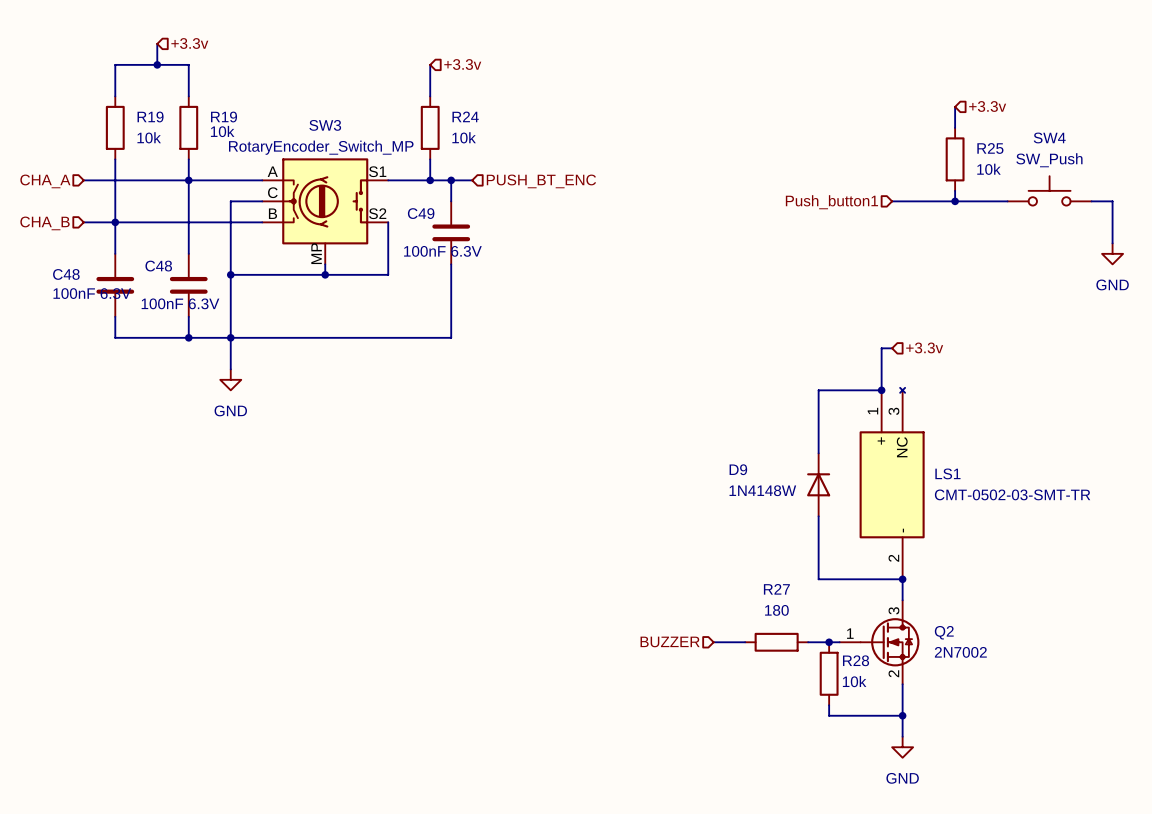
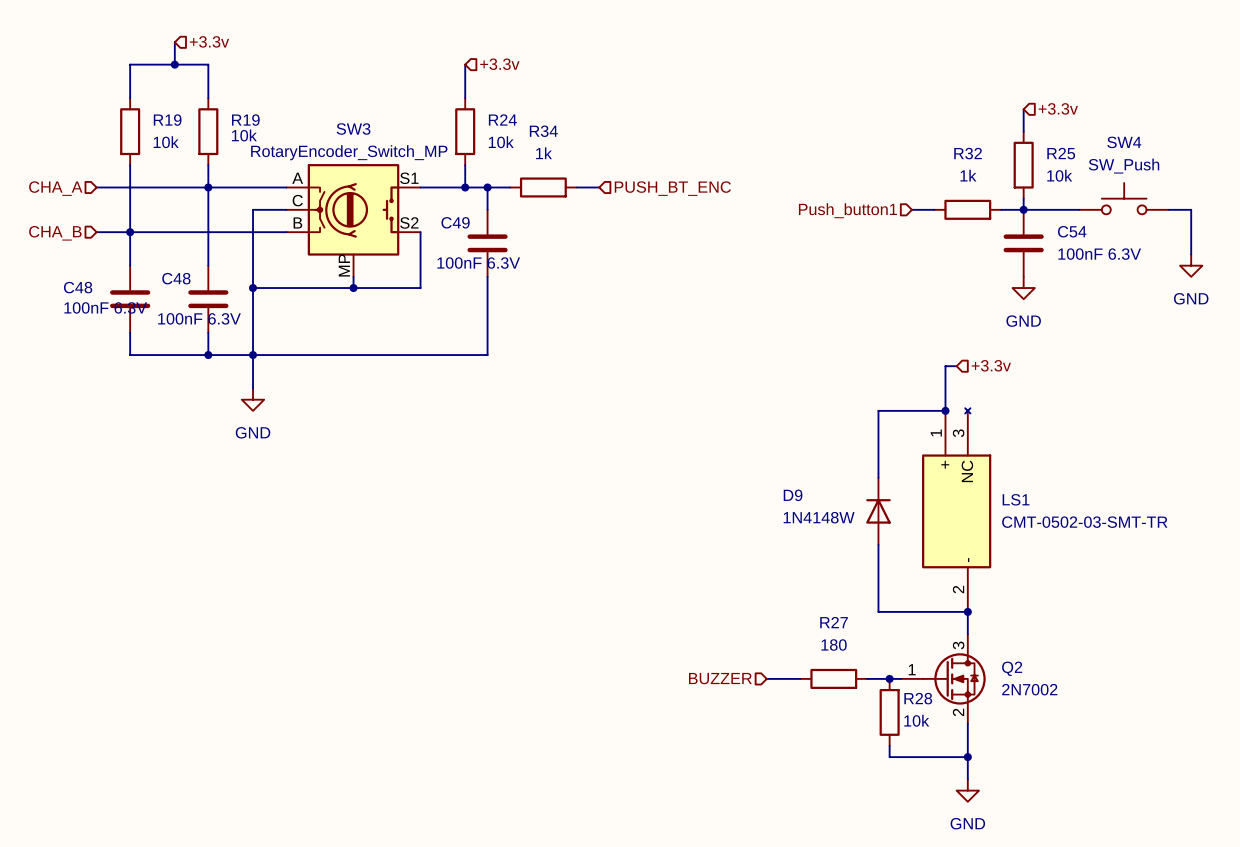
R34: none -> 1k (543, 187)
wire: none -> (576, 187) (599, 187)
hierarchical label position: PUSH_BT_ENC (541, 181) -> PUSH_BT_ENC (672, 188)
wire: none -> (911, 209) (934, 209)
wire: (892, 201) (934, 201) -> none
R32: none -> 1k (967, 209)
hierarchical label position: Push_button1 (831, 202) -> Push_button1 (847, 210)
C54: none -> 100nF 6.3V (1023, 243)
power symbol: none -> GND (1023, 288)

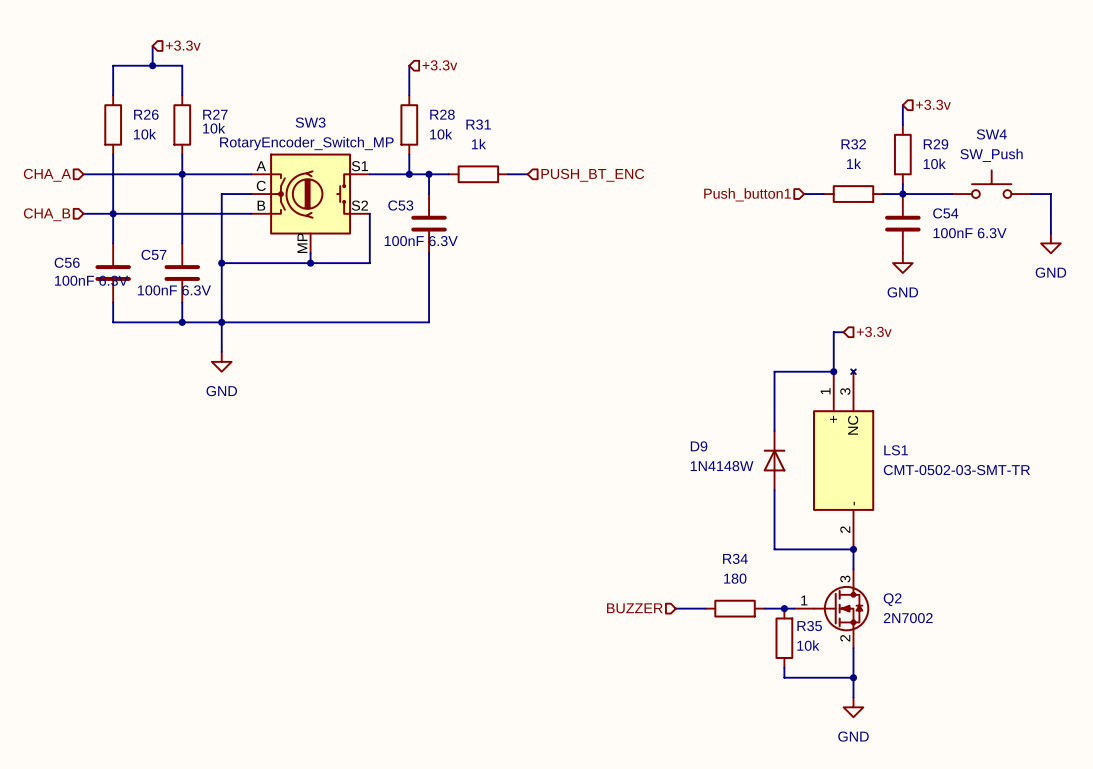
R24 name: R24 (502, 119) -> R28 (442, 114)
R19 name: R19 (167, 120) -> R26 (146, 114)
R19 name: R19 (245, 120) -> R27 (215, 114)
R34 name: R34 (543, 131) -> R31 (478, 124)
R25 name: R25 (1061, 153) -> R29 (935, 144)
C49 name: C49 (455, 222) -> C53 (400, 205)
C48 name: C48 (176, 278) -> C57 (153, 254)
C48 name: C48 (78, 287) -> C56 (67, 262)
R27 name: R27 (834, 622) -> R34 (735, 558)
R28 name: R28 (918, 698) -> R35 (809, 626)

